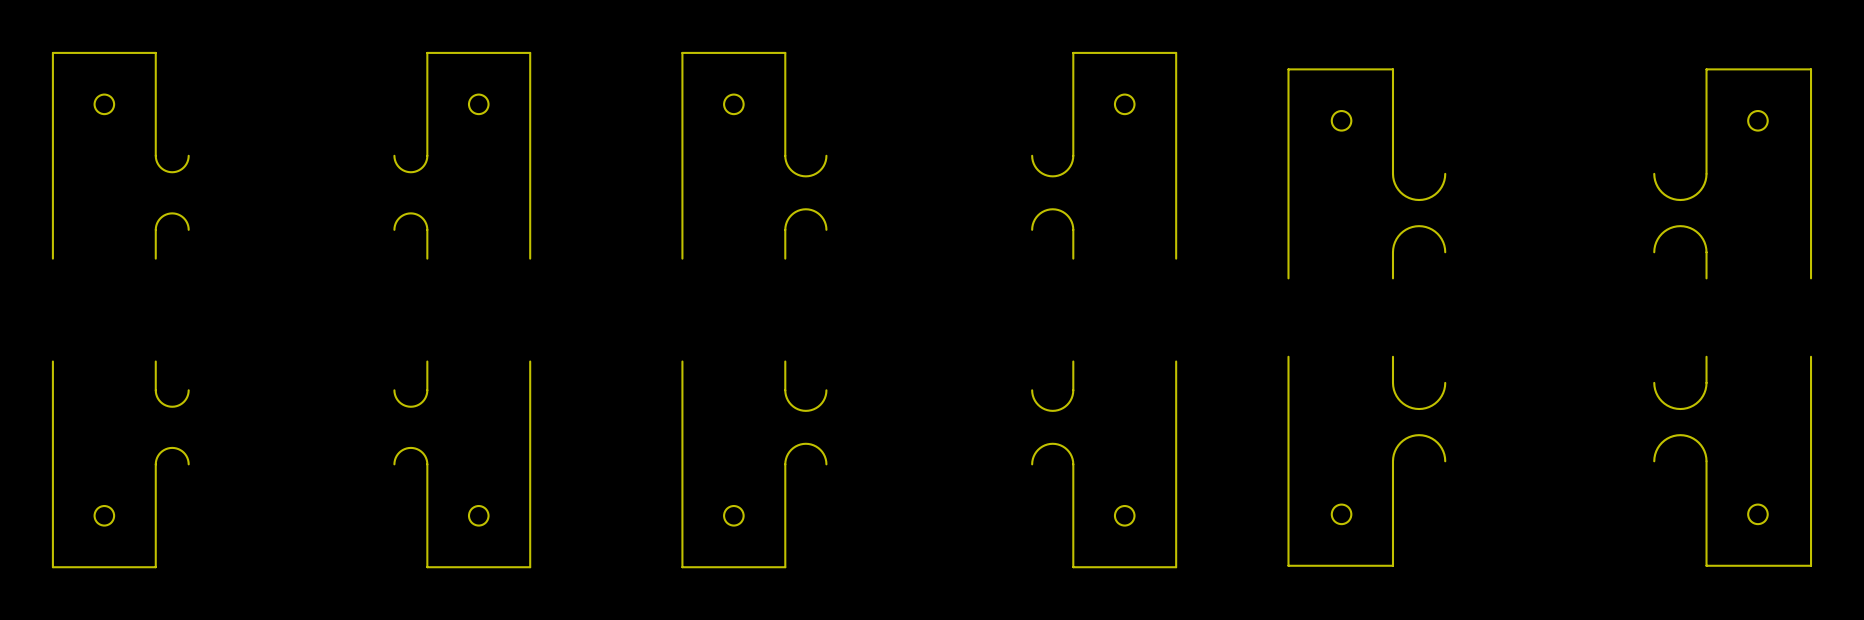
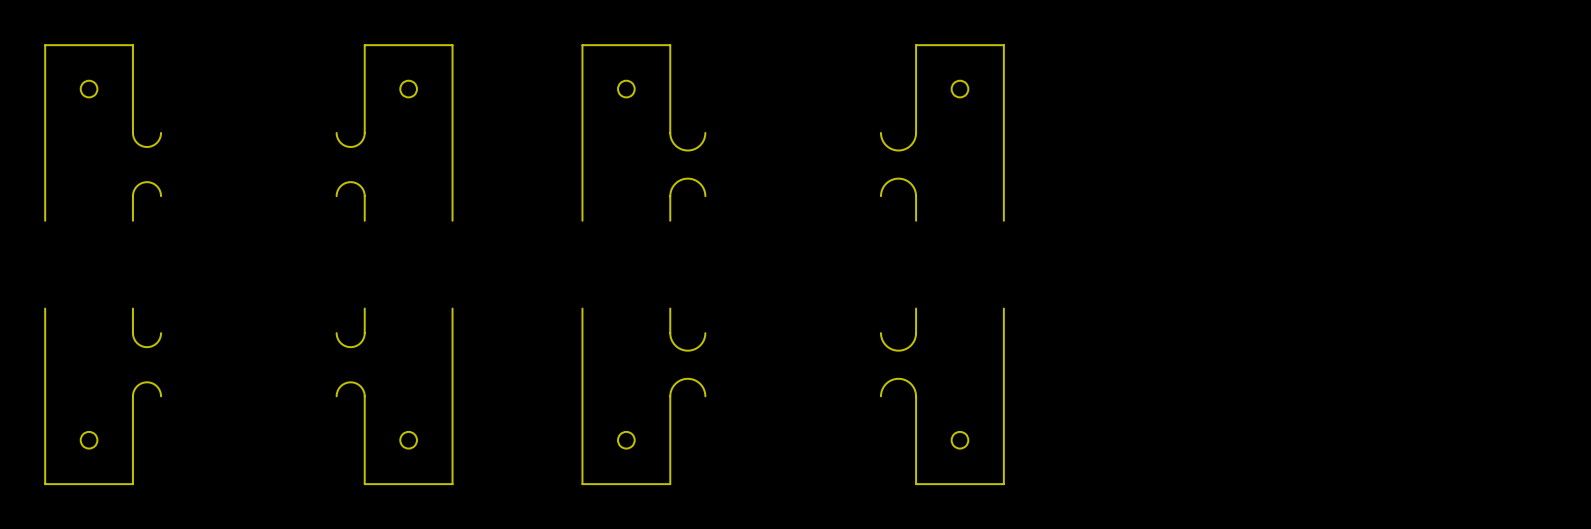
round board edge: [1330, 110, 1353, 132] -> none
round board edge: [1747, 110, 1769, 132] -> none
board edge: (1445, 173) (1439, 189) (1425, 199) (1409, 198) (1396, 186) (1392, 173) (1392, 69) (1288, 69) (1288, 278) -> none
board edge: (1654, 173) (1659, 189) (1673, 199) (1690, 198) (1703, 186) (1706, 173) (1706, 69) (1811, 69) (1811, 278) -> none
board edge: (1445, 252) (1441, 239) (1432, 229) (1419, 226) (1406, 229) (1398, 236) (1393, 245) (1392, 278) -> none
board edge: (1654, 252) (1657, 239) (1667, 229) (1680, 226) (1693, 229) (1701, 236) (1705, 245) (1706, 278) -> none
board edge: (1288, 356) (1288, 565) (1392, 565) (1392, 461) (1396, 448) (1409, 437) (1425, 436) (1439, 445) (1445, 461) -> none
board edge: (1392, 356) (1393, 389) (1398, 398) (1406, 405) (1419, 409) (1432, 405) (1441, 395) (1445, 382) -> none
board edge: (1706, 356) (1705, 389) (1701, 398) (1693, 405) (1680, 409) (1667, 405) (1657, 395) (1654, 382) -> none
board edge: (1811, 356) (1811, 565) (1706, 565) (1706, 461) (1703, 448) (1690, 437) (1673, 436) (1659, 445) (1654, 461) -> none
round board edge: [1330, 503, 1353, 526] -> none
round board edge: [1747, 503, 1769, 526] -> none

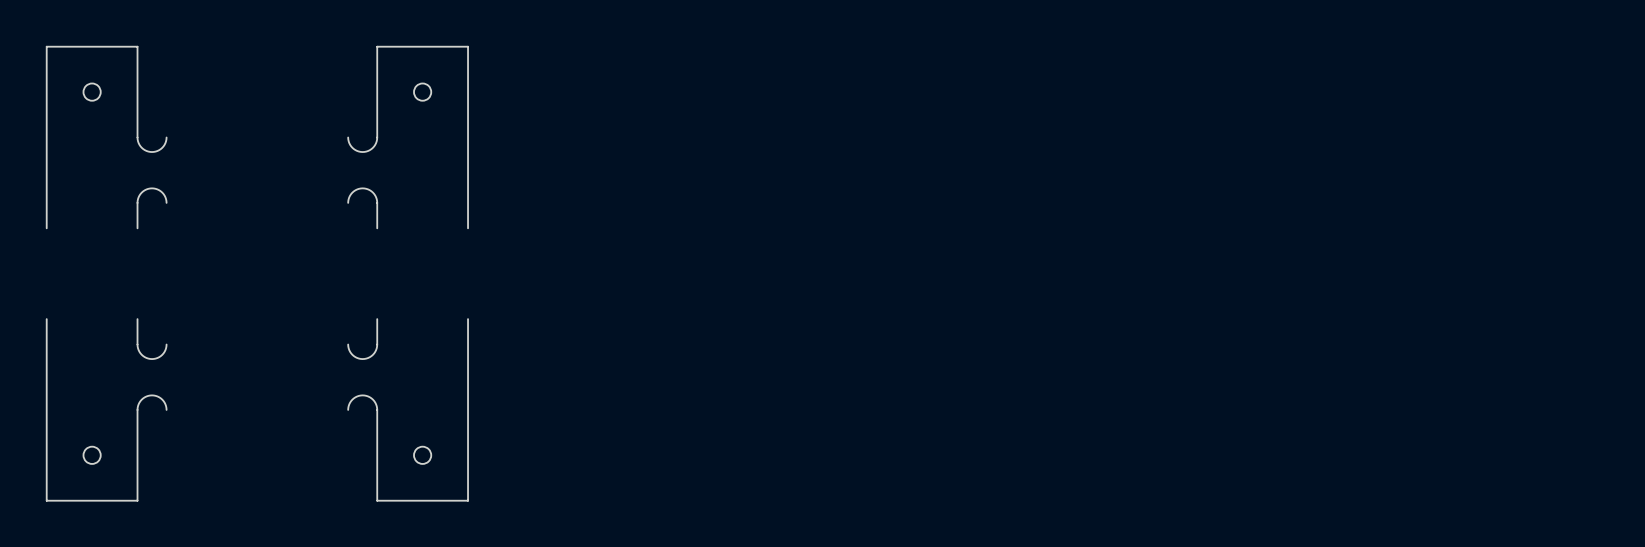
round board edge: [617, 79, 636, 99] -> none
round board edge: [950, 79, 970, 99] -> none
board edge: (705, 132) (701, 143) (692, 149) (679, 148) (671, 139) (670, 45) (582, 45) (582, 220) -> none
board edge: (880, 132) (884, 143) (893, 149) (907, 148) (914, 139) (916, 45) (1003, 45) (1003, 220) -> none
board edge: (705, 196) (703, 187) (696, 180) (687, 178) (677, 182) (670, 193) (670, 220) -> none
board edge: (880, 196) (883, 187) (889, 180) (898, 178) (909, 182) (915, 193) (916, 220) -> none
board edge: (582, 308) (582, 484) (670, 484) (671, 389) (681, 380) (692, 379) (701, 385) (705, 396) -> none
board edge: (670, 308) (670, 335) (677, 347) (685, 350) (694, 349) (701, 343) (705, 333) -> none
board edge: (916, 308) (915, 335) (909, 347) (900, 350) (891, 349) (884, 343) (880, 333) -> none
board edge: (1003, 308) (1003, 484) (916, 484) (914, 389) (905, 380) (893, 379) (884, 385) (880, 396) -> none
round board edge: [617, 431, 636, 450] -> none
round board edge: [950, 431, 970, 450] -> none

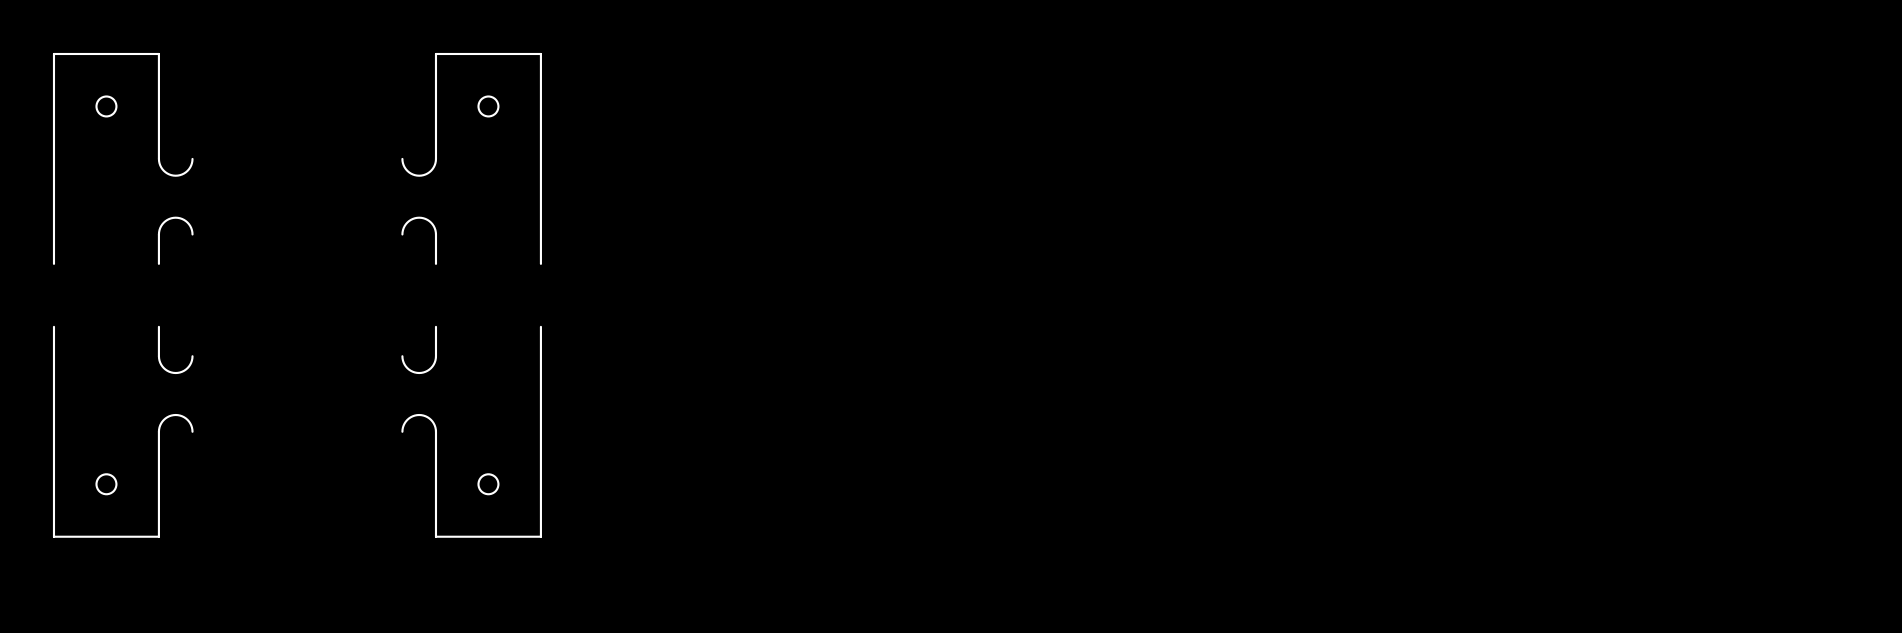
board edge: none -> (53, 326) (53, 368)
board edge: none -> (540, 326) (540, 368)
board edge: (137, 319) (137, 346) (143, 356) (150, 358) (157, 357) (163, 353) (166, 344) -> (158, 326) (159, 358) (165, 369) (173, 372) (182, 371) (189, 366) (192, 356)
board edge: (377, 319) (377, 346) (371, 356) (362, 359) (355, 357) (350, 351) (348, 344) -> (435, 326) (435, 358) (429, 369) (419, 373) (410, 370) (404, 364) (402, 356)
board edge: (137, 409) (141, 399) (152, 395) (162, 399) (166, 409) -> (158, 473) (159, 429) (162, 421) (171, 415) (182, 416) (189, 421) (192, 431)
board edge: (348, 409) (352, 399) (362, 395) (372, 399) (377, 409) -> (402, 431) (405, 421) (412, 416) (423, 415) (432, 421) (435, 429) (435, 473)
round board edge position: (92, 455) -> (106, 484)
round board edge position: (422, 455) -> (488, 484)
board edge: (46, 464) (46, 500) (137, 500) (137, 464) -> (53, 536) (158, 536)
board edge: (377, 464) (377, 500) (468, 500) (468, 464) -> (435, 536) (540, 536)

